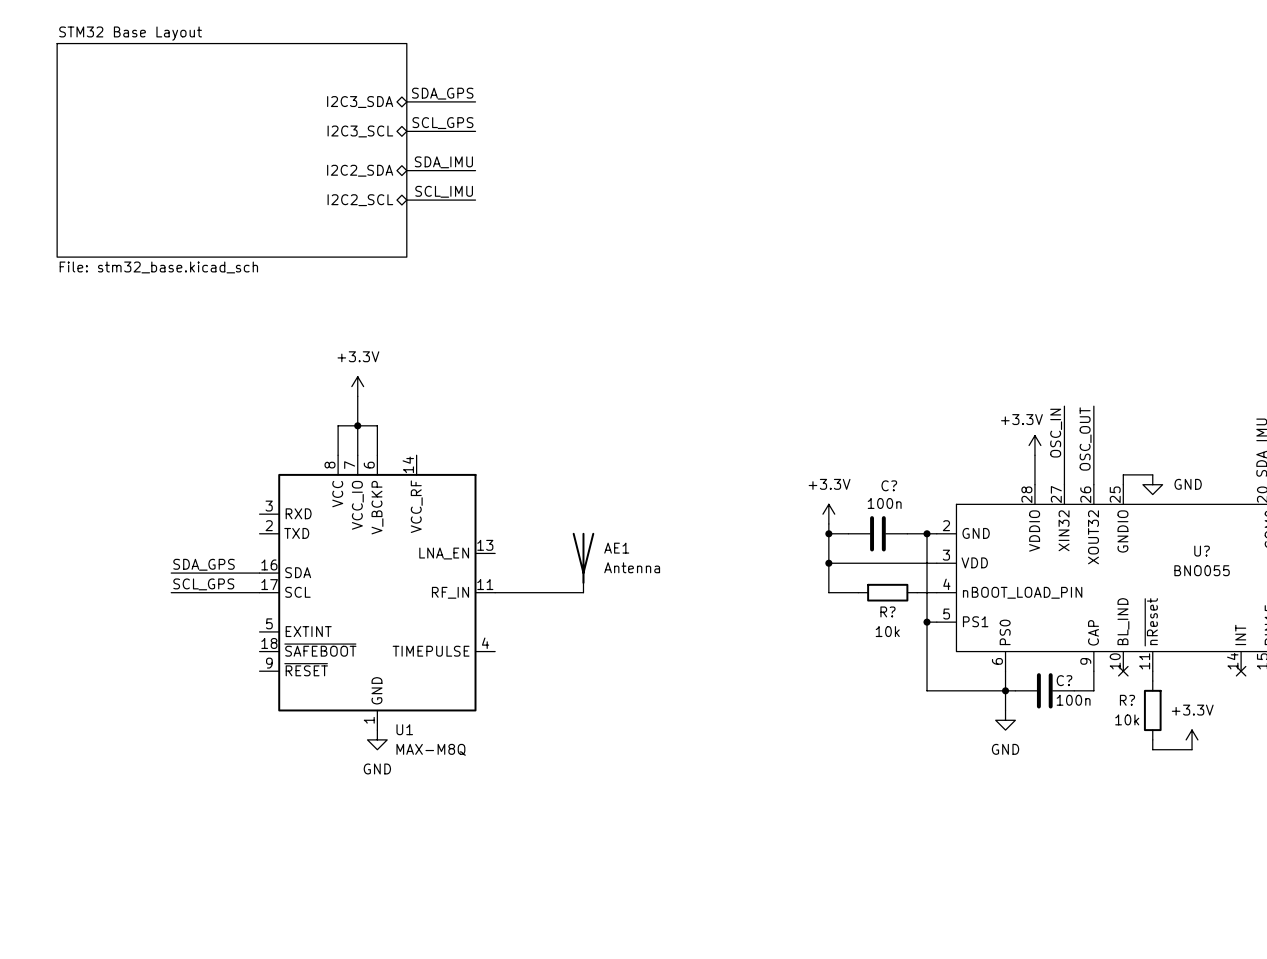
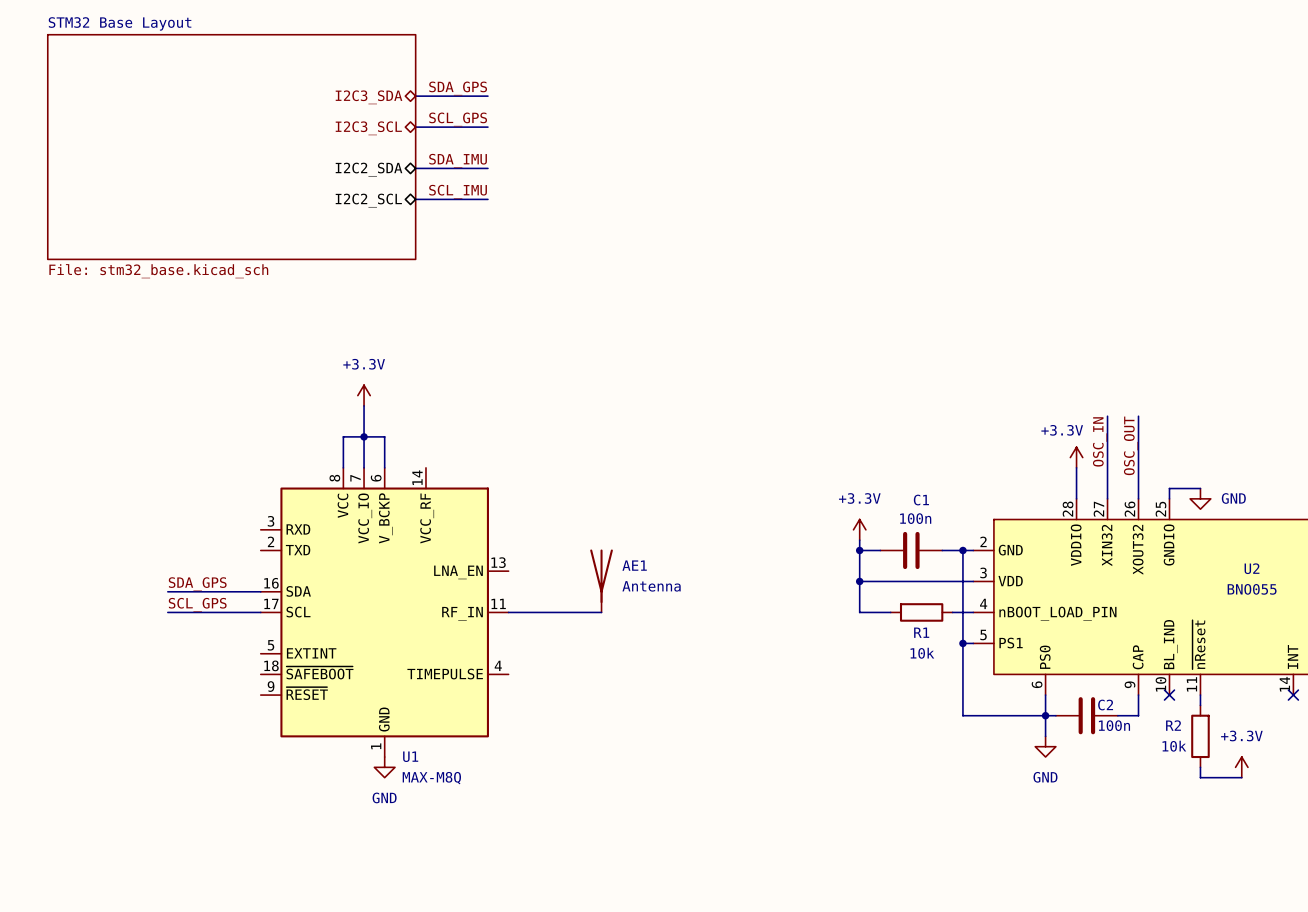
C? name: C? (889, 485) -> C1 (921, 500)
U? name: U? (1202, 551) -> U2 (1252, 568)
R? name: R? (887, 611) -> R1 (921, 632)
C? name: C? (1064, 680) -> C2 (1105, 705)
R? name: R? (1127, 700) -> R2 (1173, 725)

